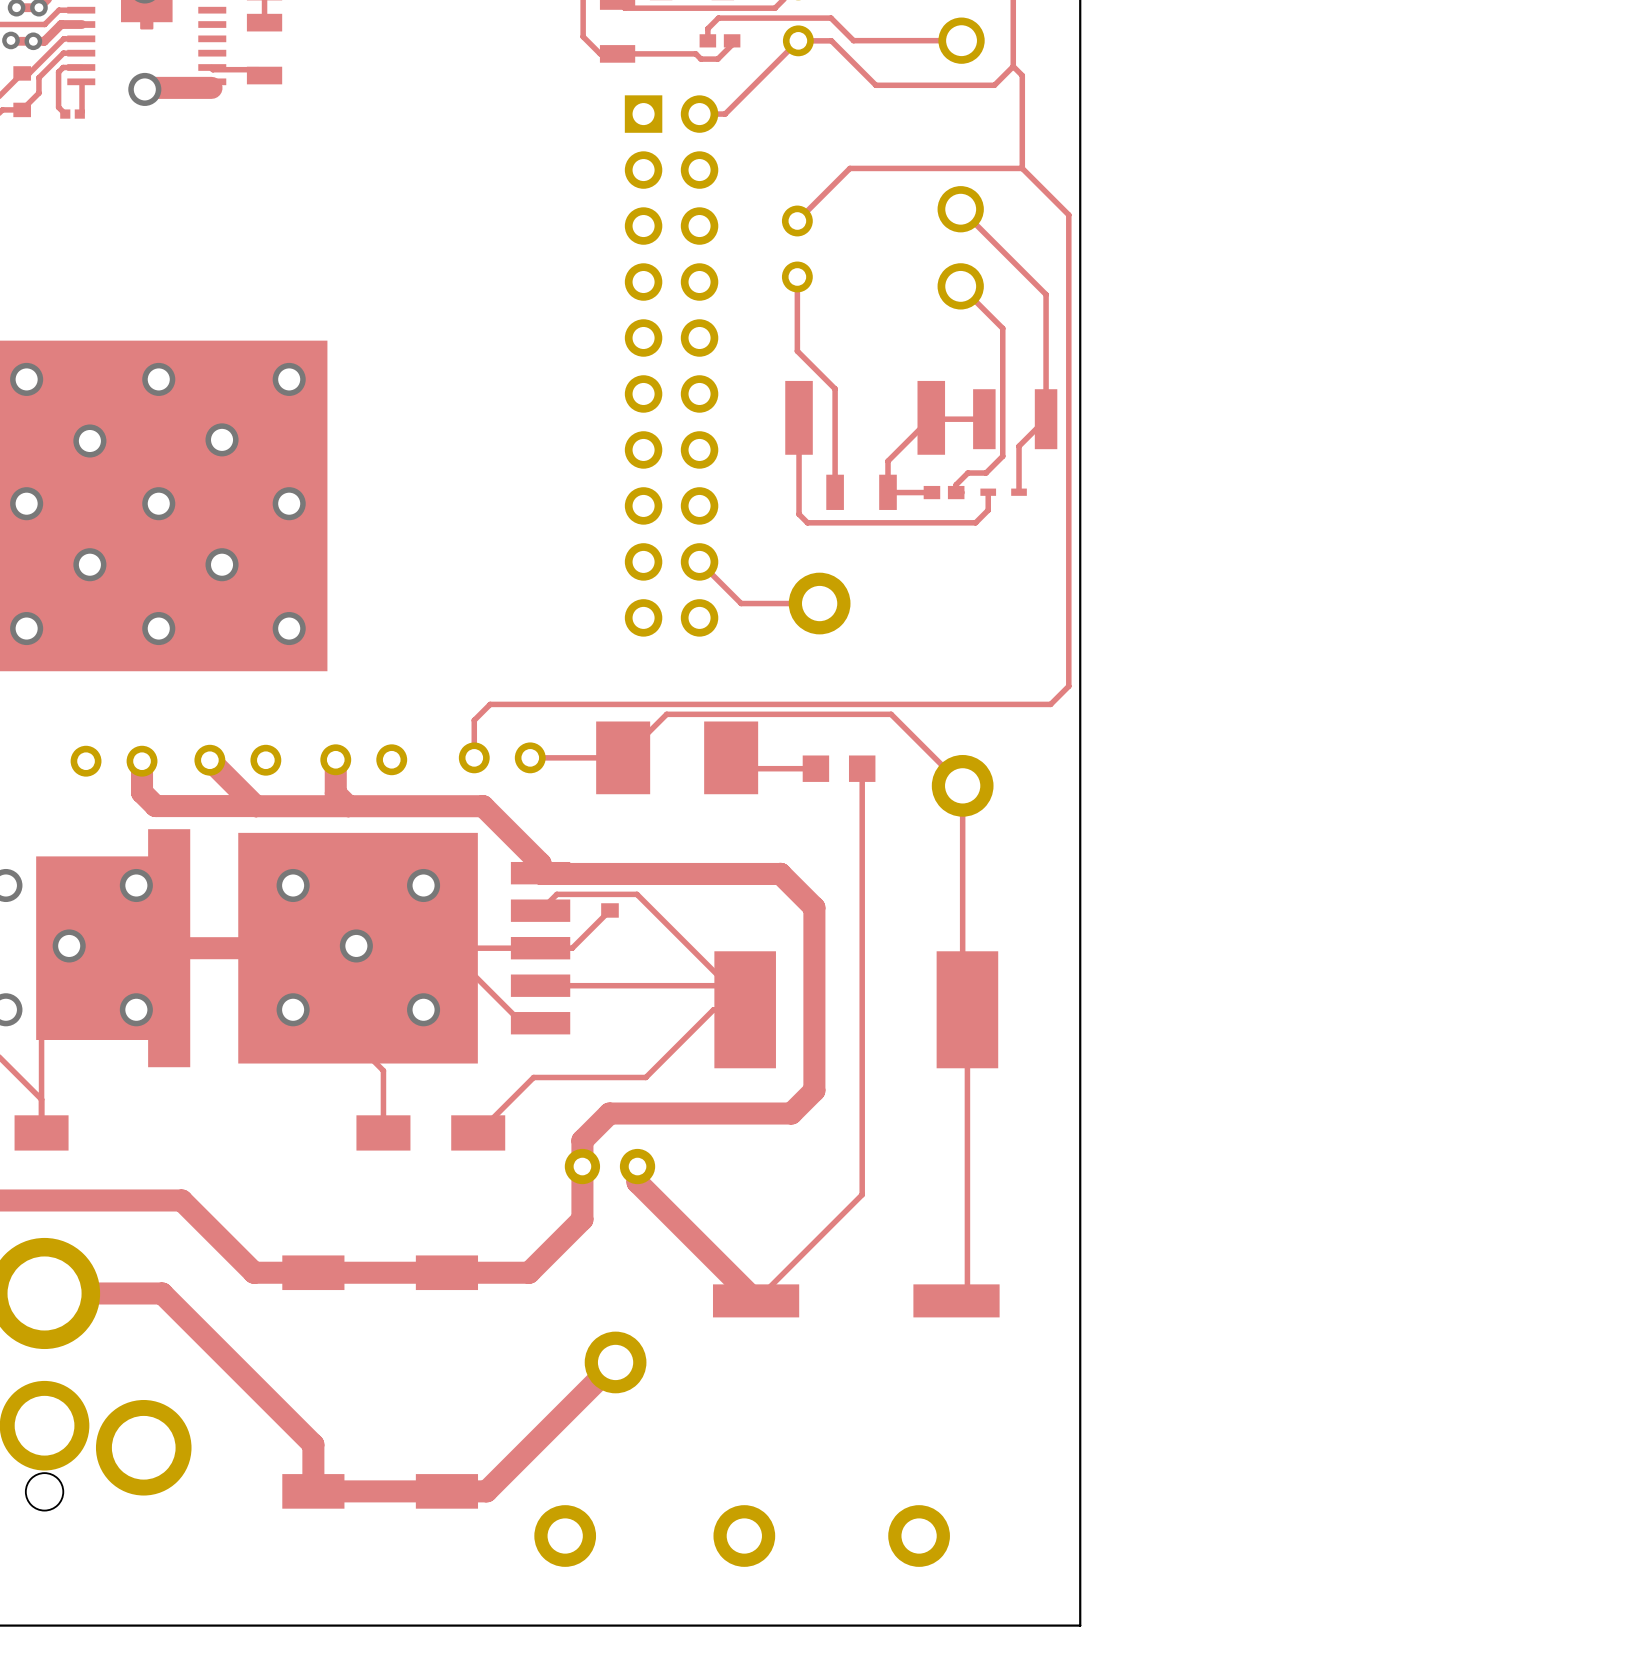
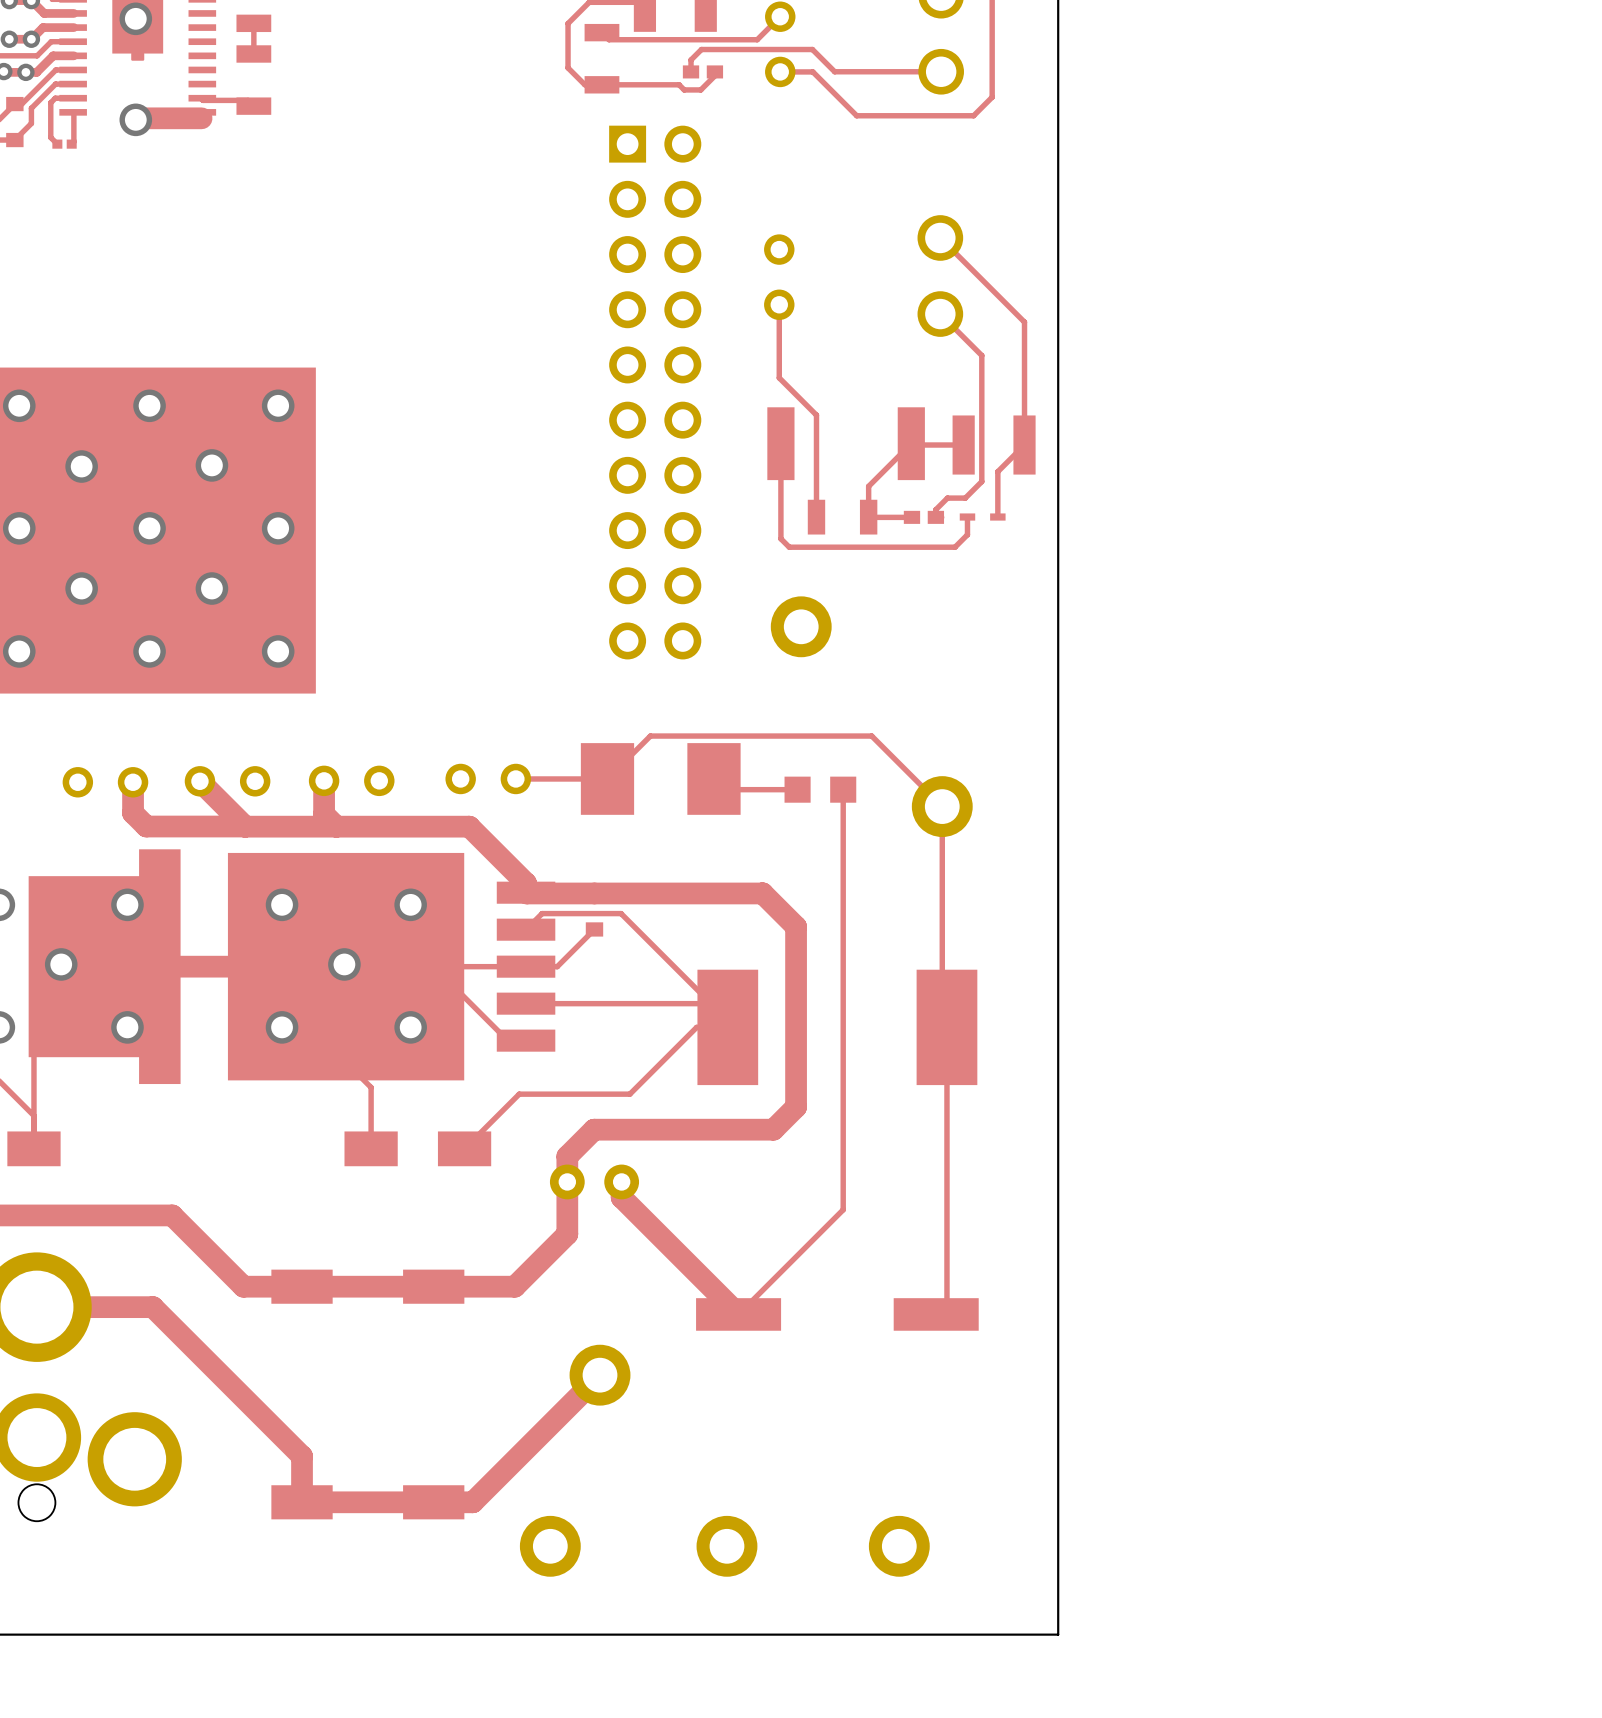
top track: (798, 40) (725, 114) (699, 114) -> none
top track: (1013, 66) (1022, 75) (1022, 168) -> none
top track: (1022, 168) (1068, 214) (1068, 686) (1050, 704) (490, 704) (474, 720) (474, 757) -> none
top track: (1022, 168) (849, 168) (797, 220) -> none
top track: (699, 561) (741, 603) (819, 603) -> none

